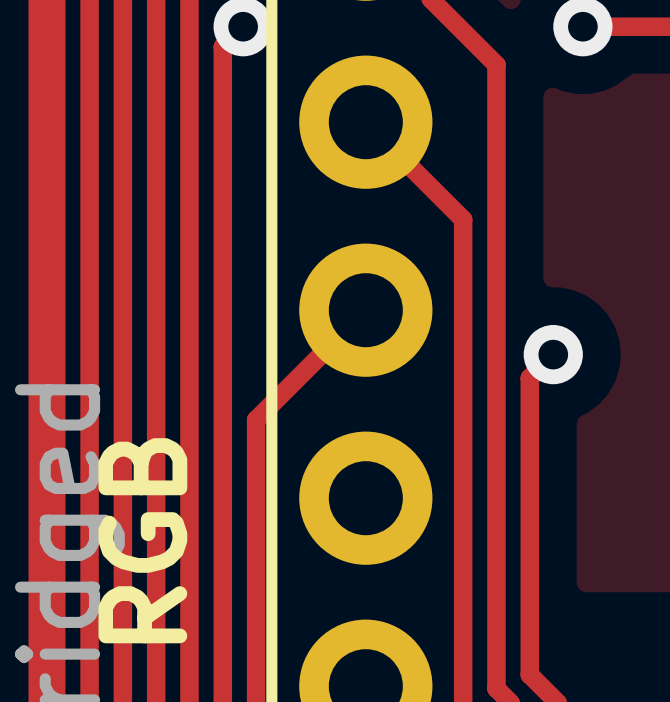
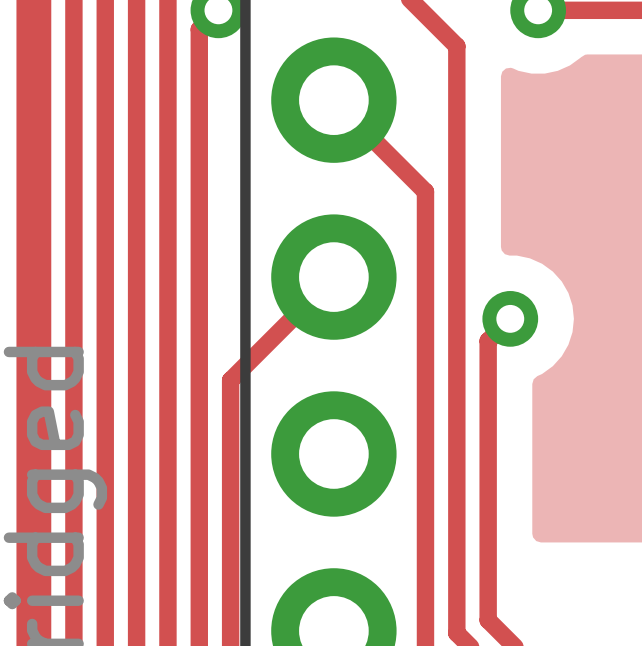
text: RGB (142, 540) -> none

